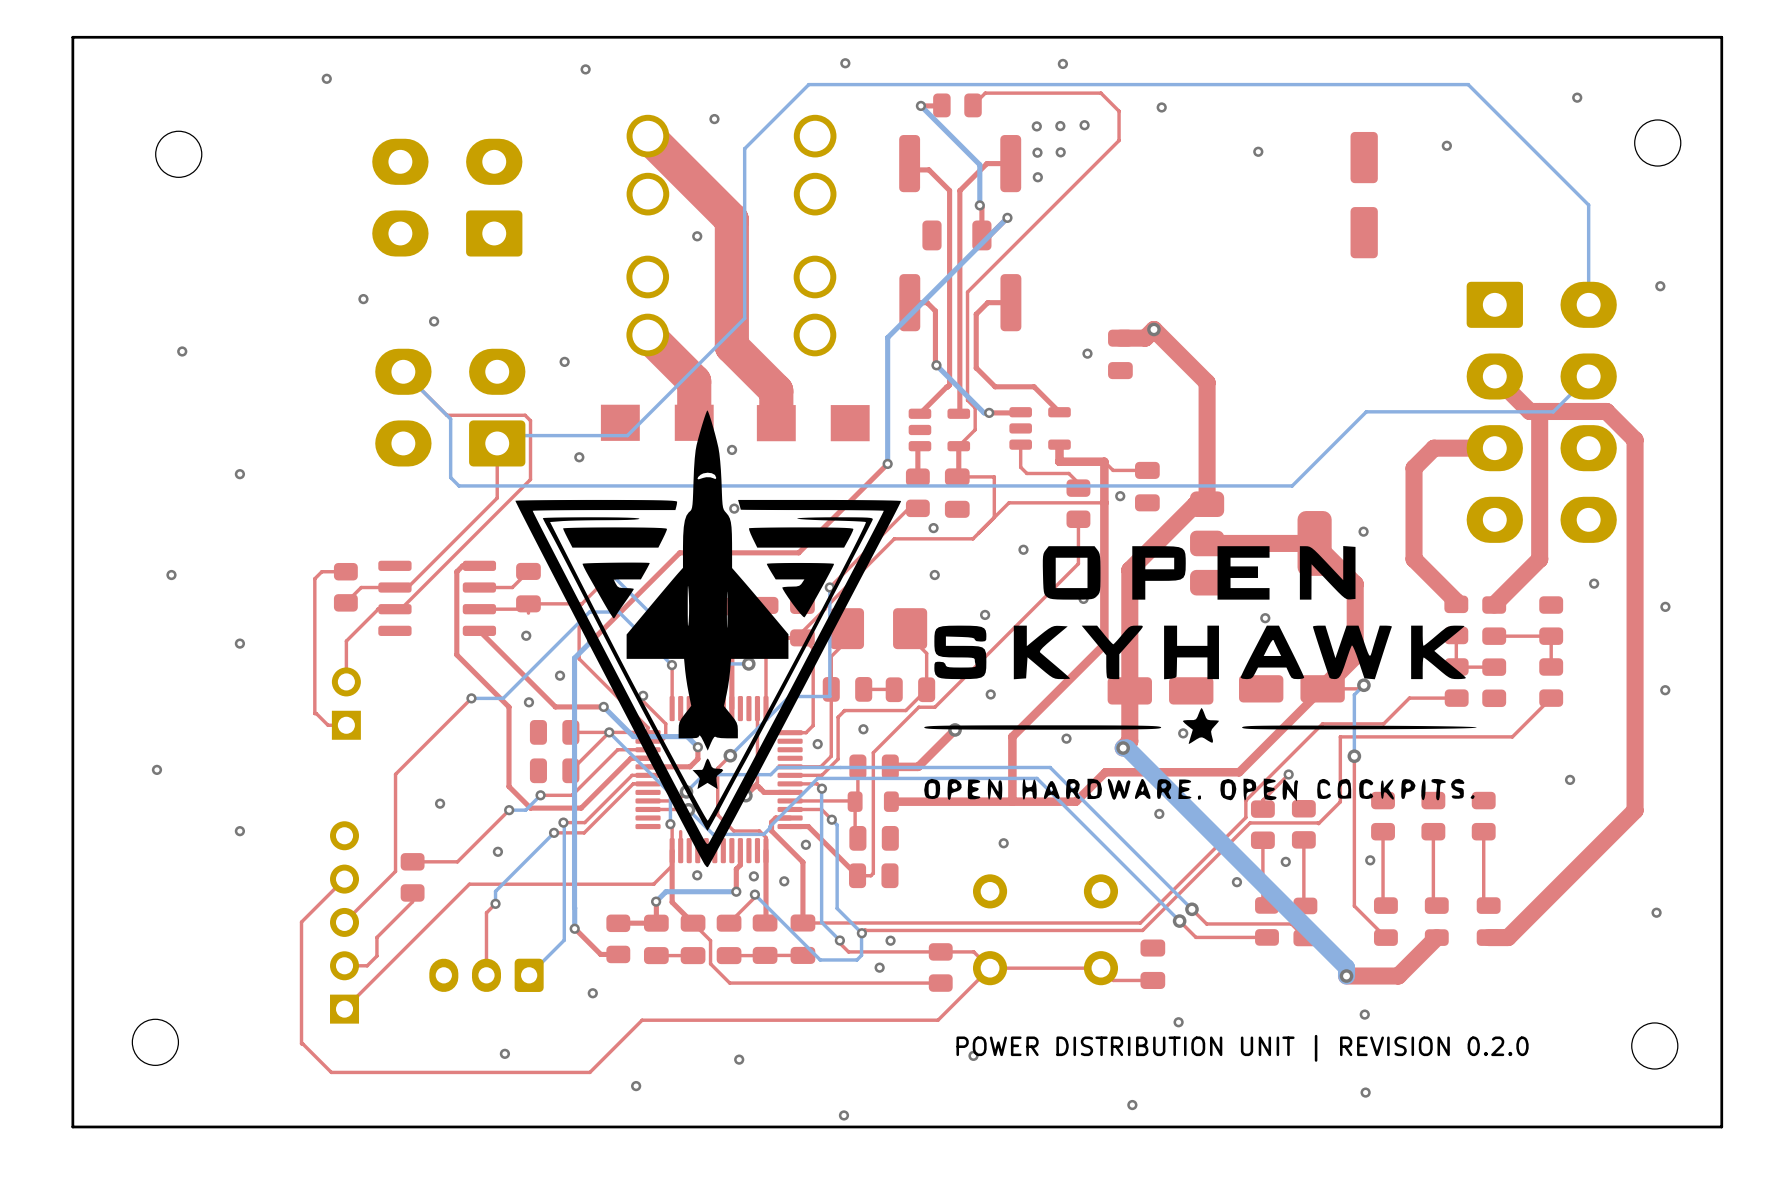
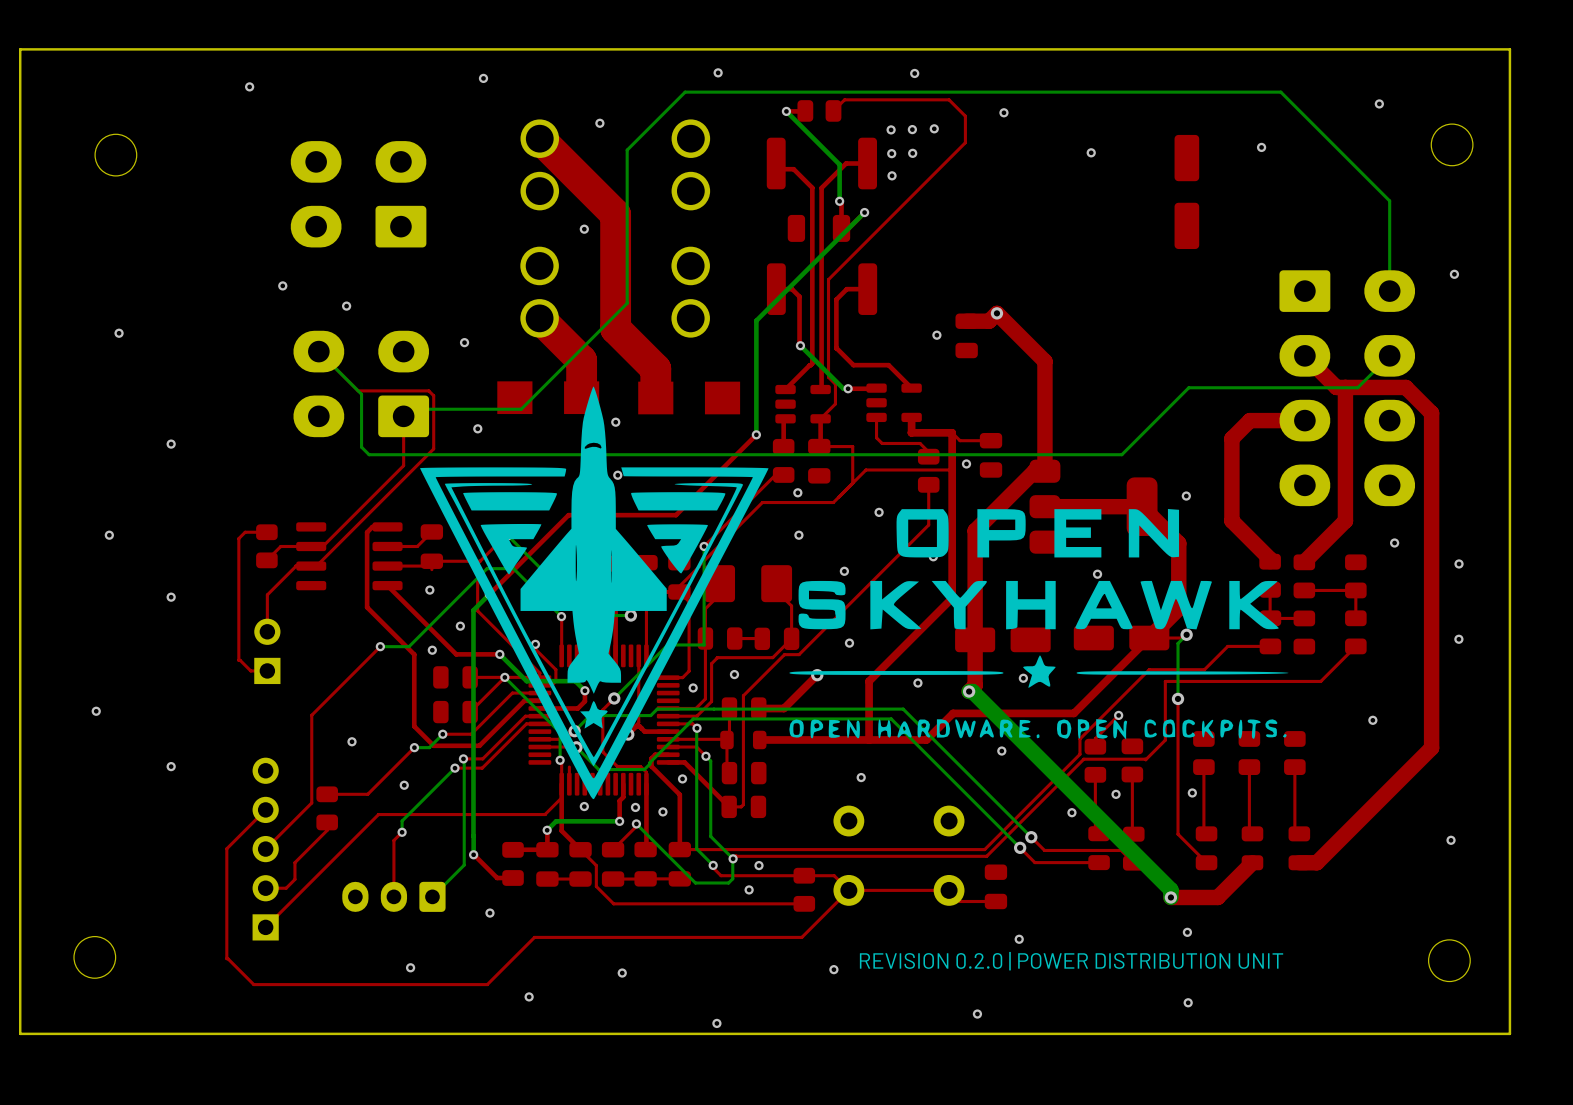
text: POWER DISTRIBUTION UNIT | REVISION 0.2.0 (1242, 1048) -> none
text: none -> REVISION 0.2.0 | POWER DISTRIBUTION UNIT (1071, 961)

